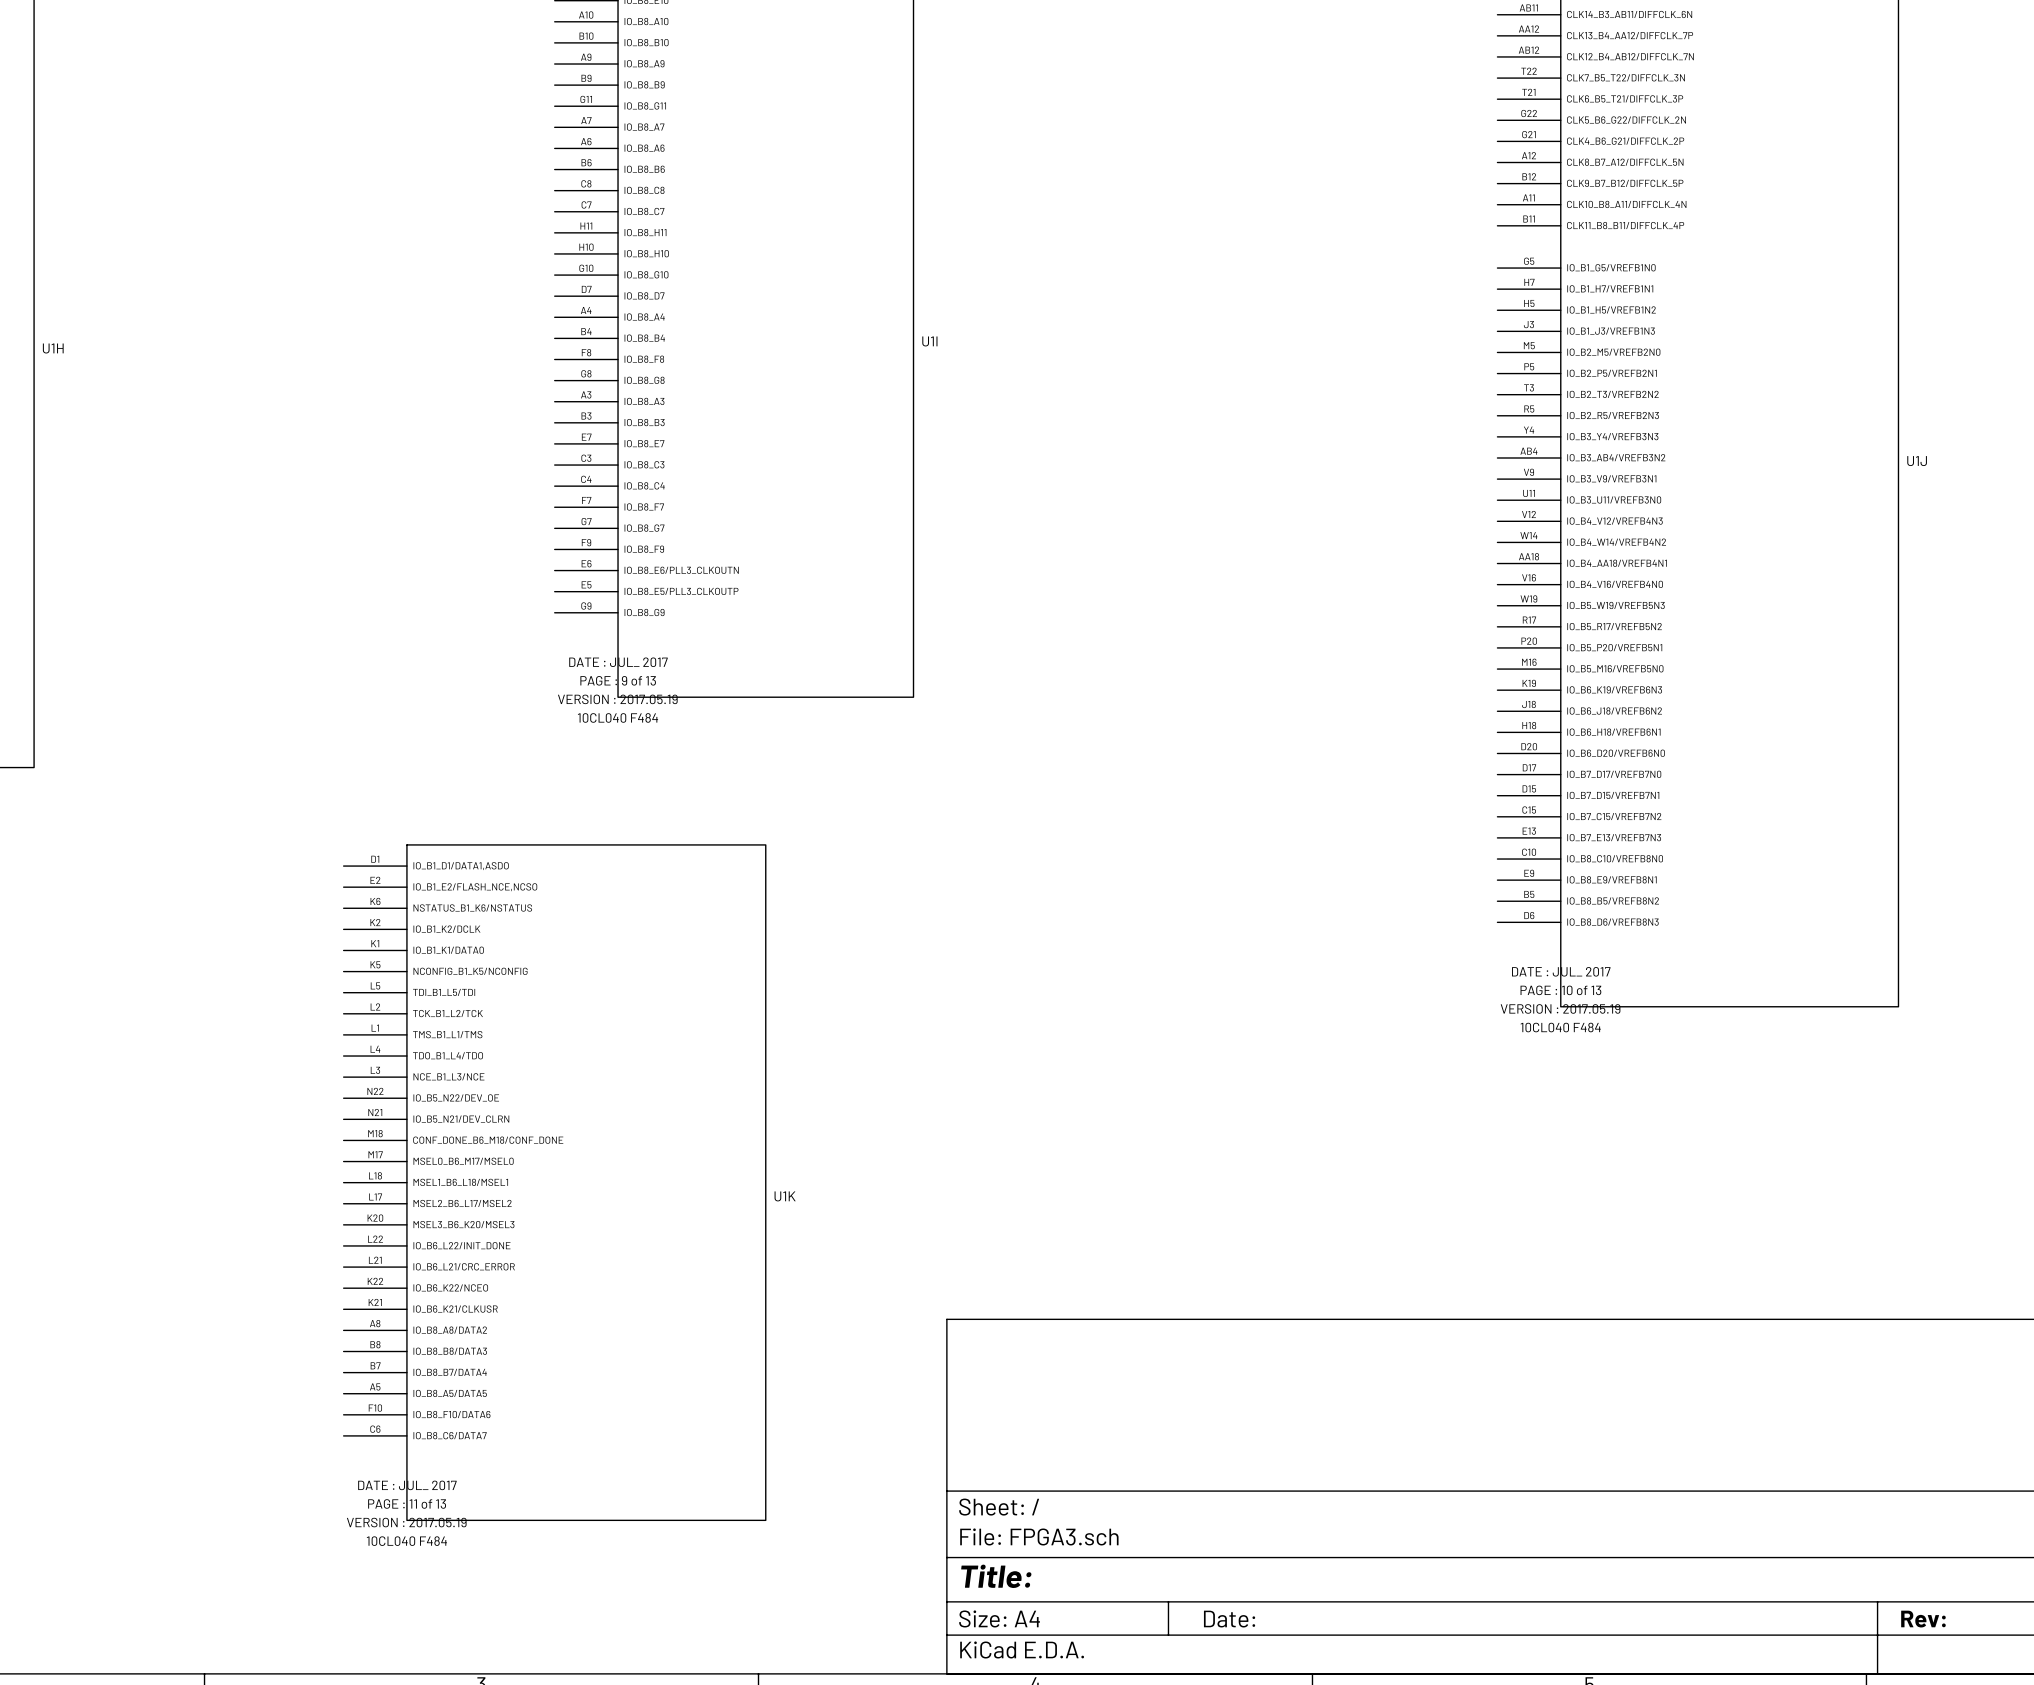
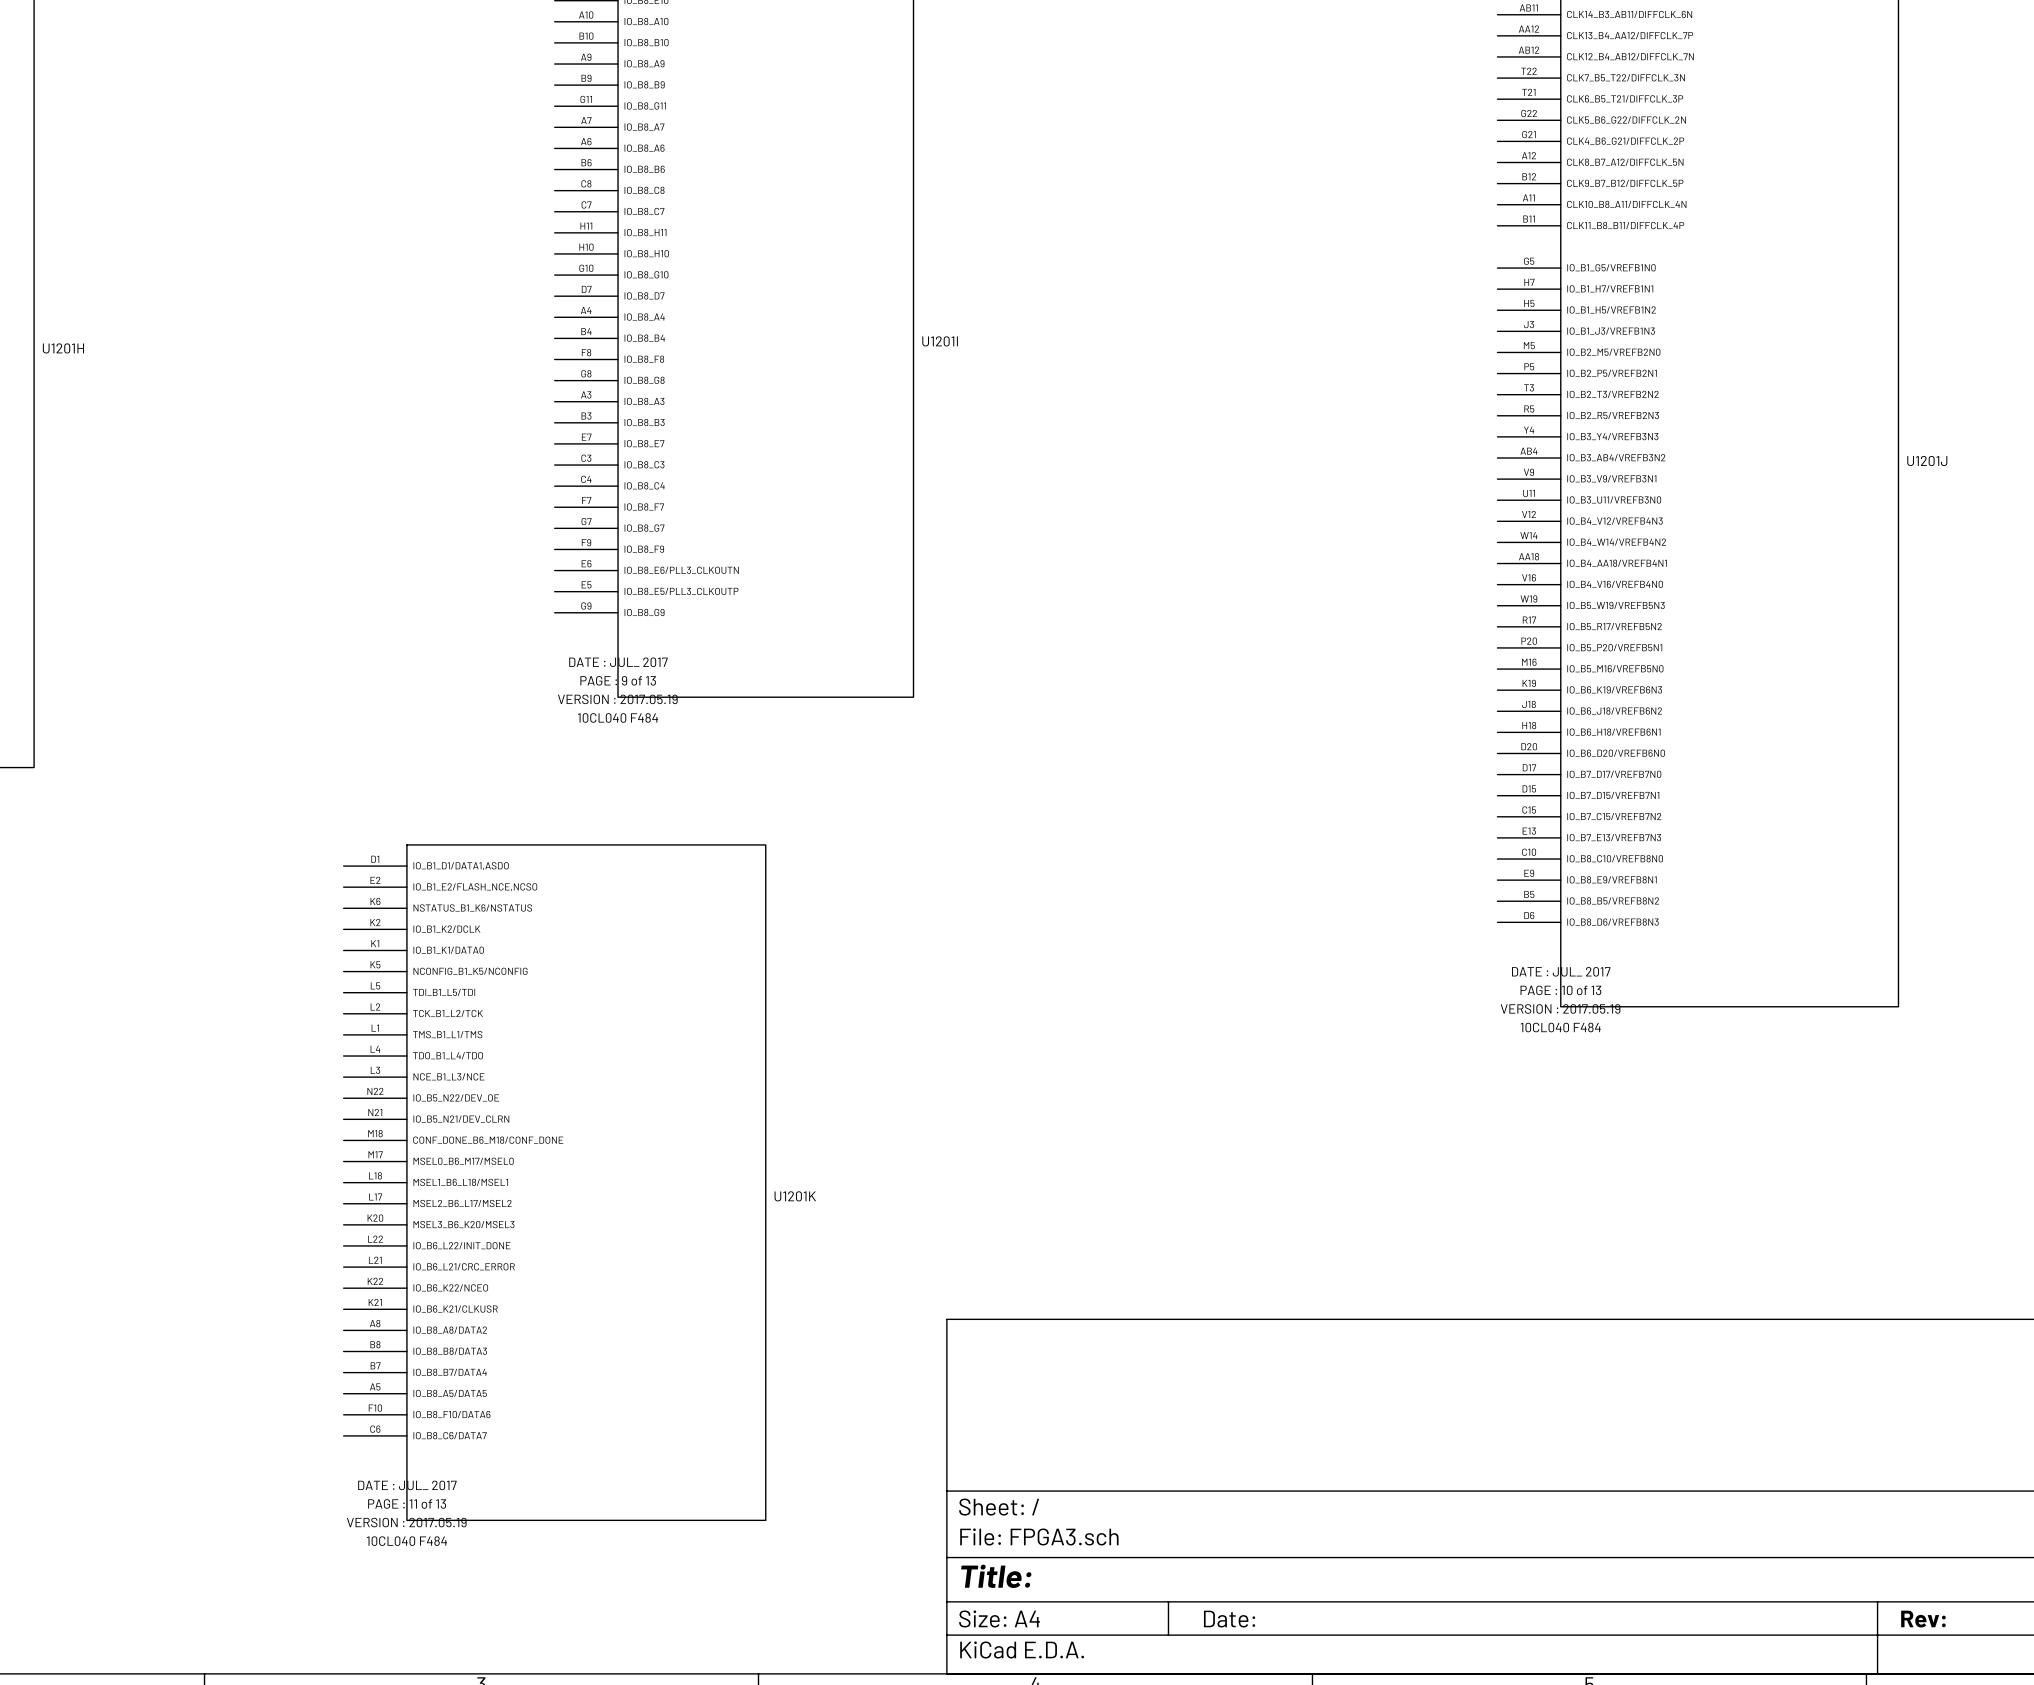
U1I name: U1I (929, 341) -> U1201I (940, 341)
U1H name: U1H (53, 348) -> U1201H (63, 348)
U1J name: U1J (1917, 461) -> U1201J (1927, 461)
U1K name: U1K (785, 1196) -> U1201K (795, 1196)

